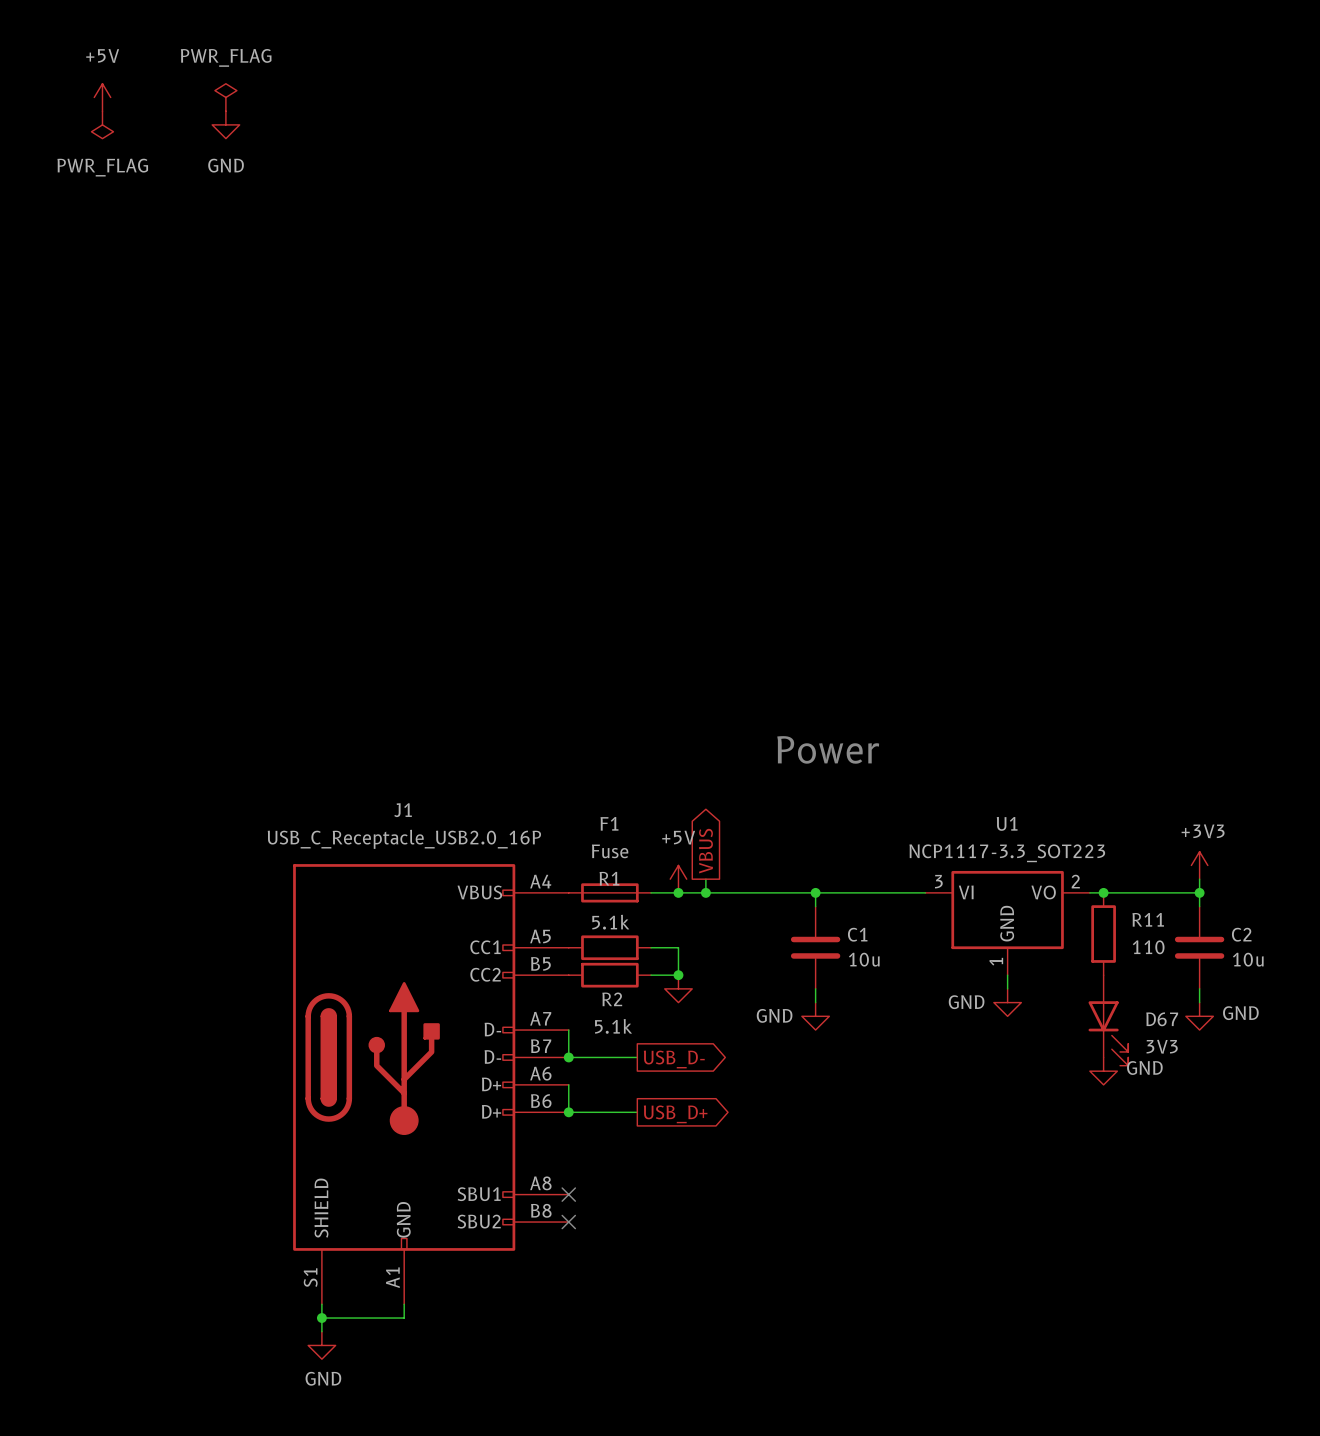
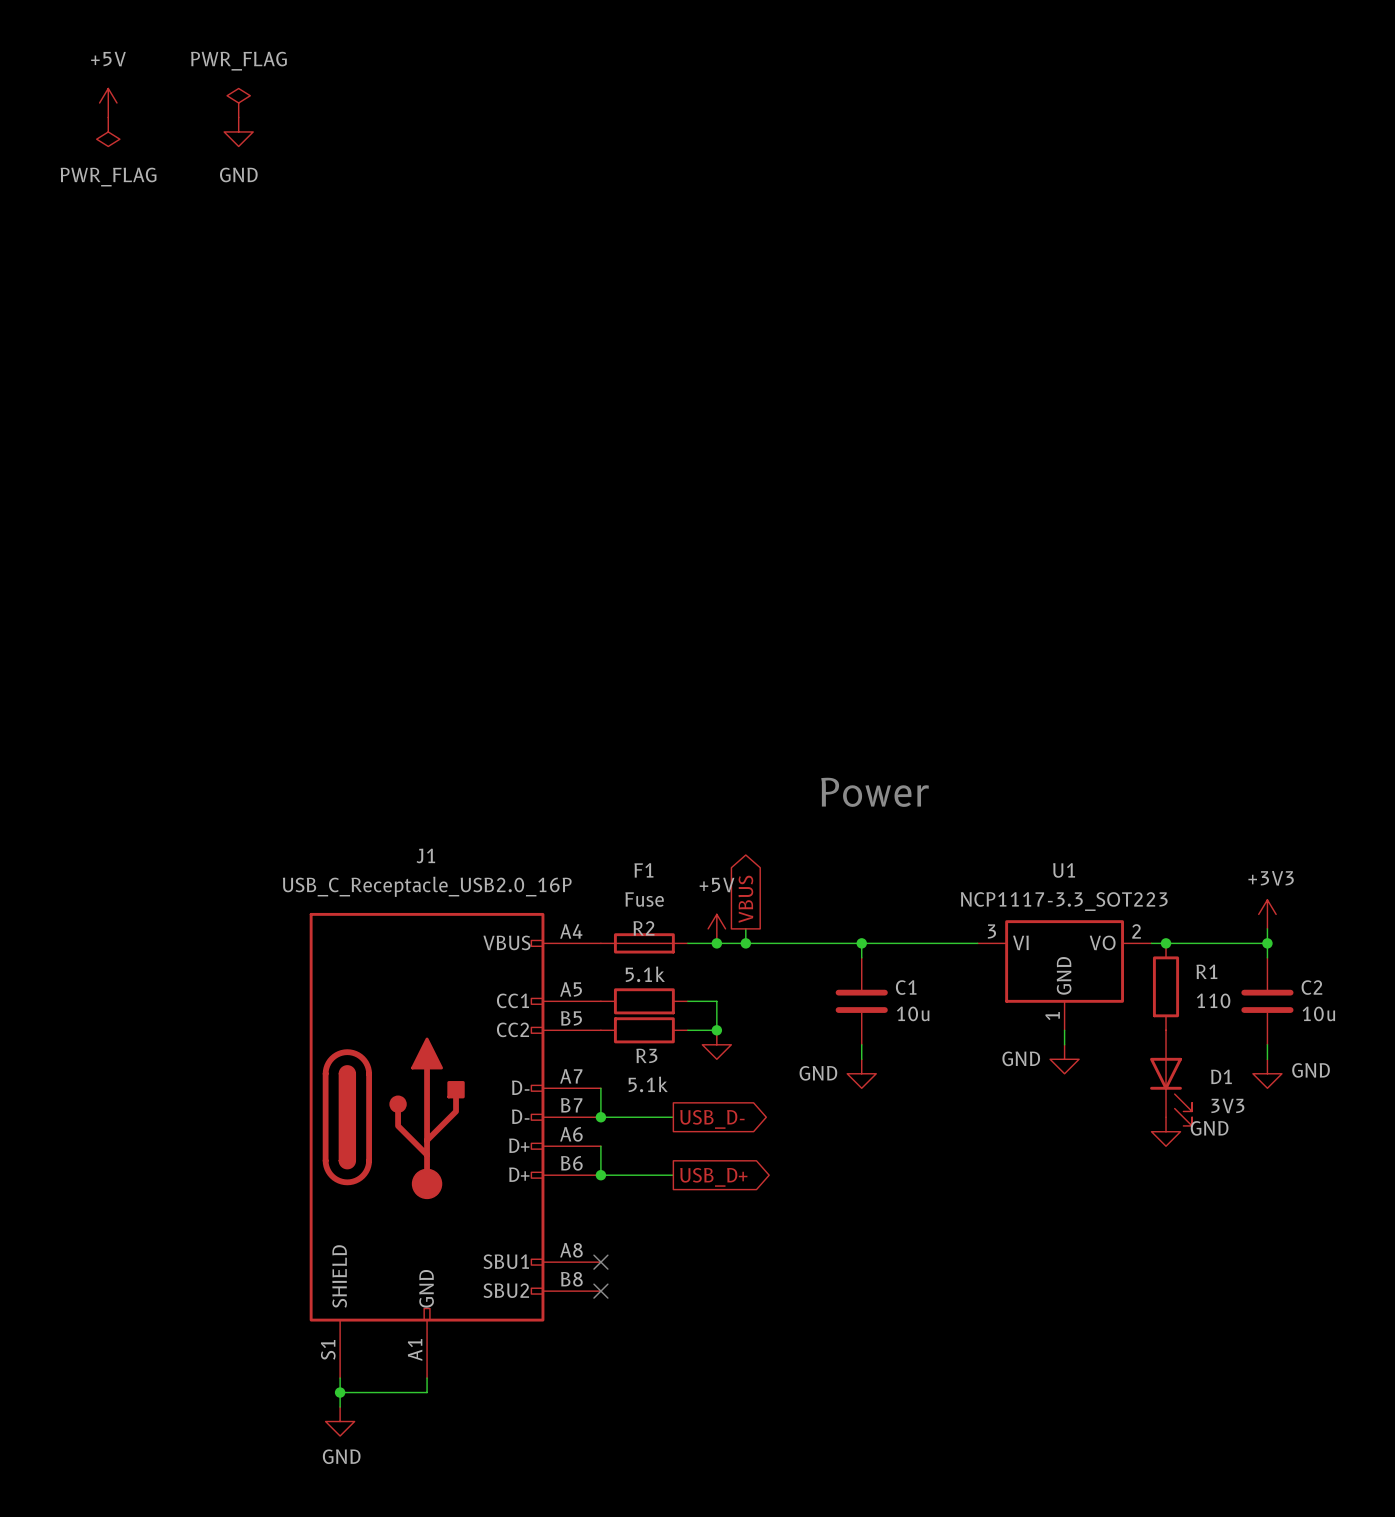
R1 name: R1 (609, 878) -> R2 (643, 928)
R11 name: R11 (1148, 919) -> R1 (1206, 971)
R2 name: R2 (612, 999) -> R3 (646, 1055)
D67 name: D67 (1162, 1019) -> D1 (1221, 1076)

